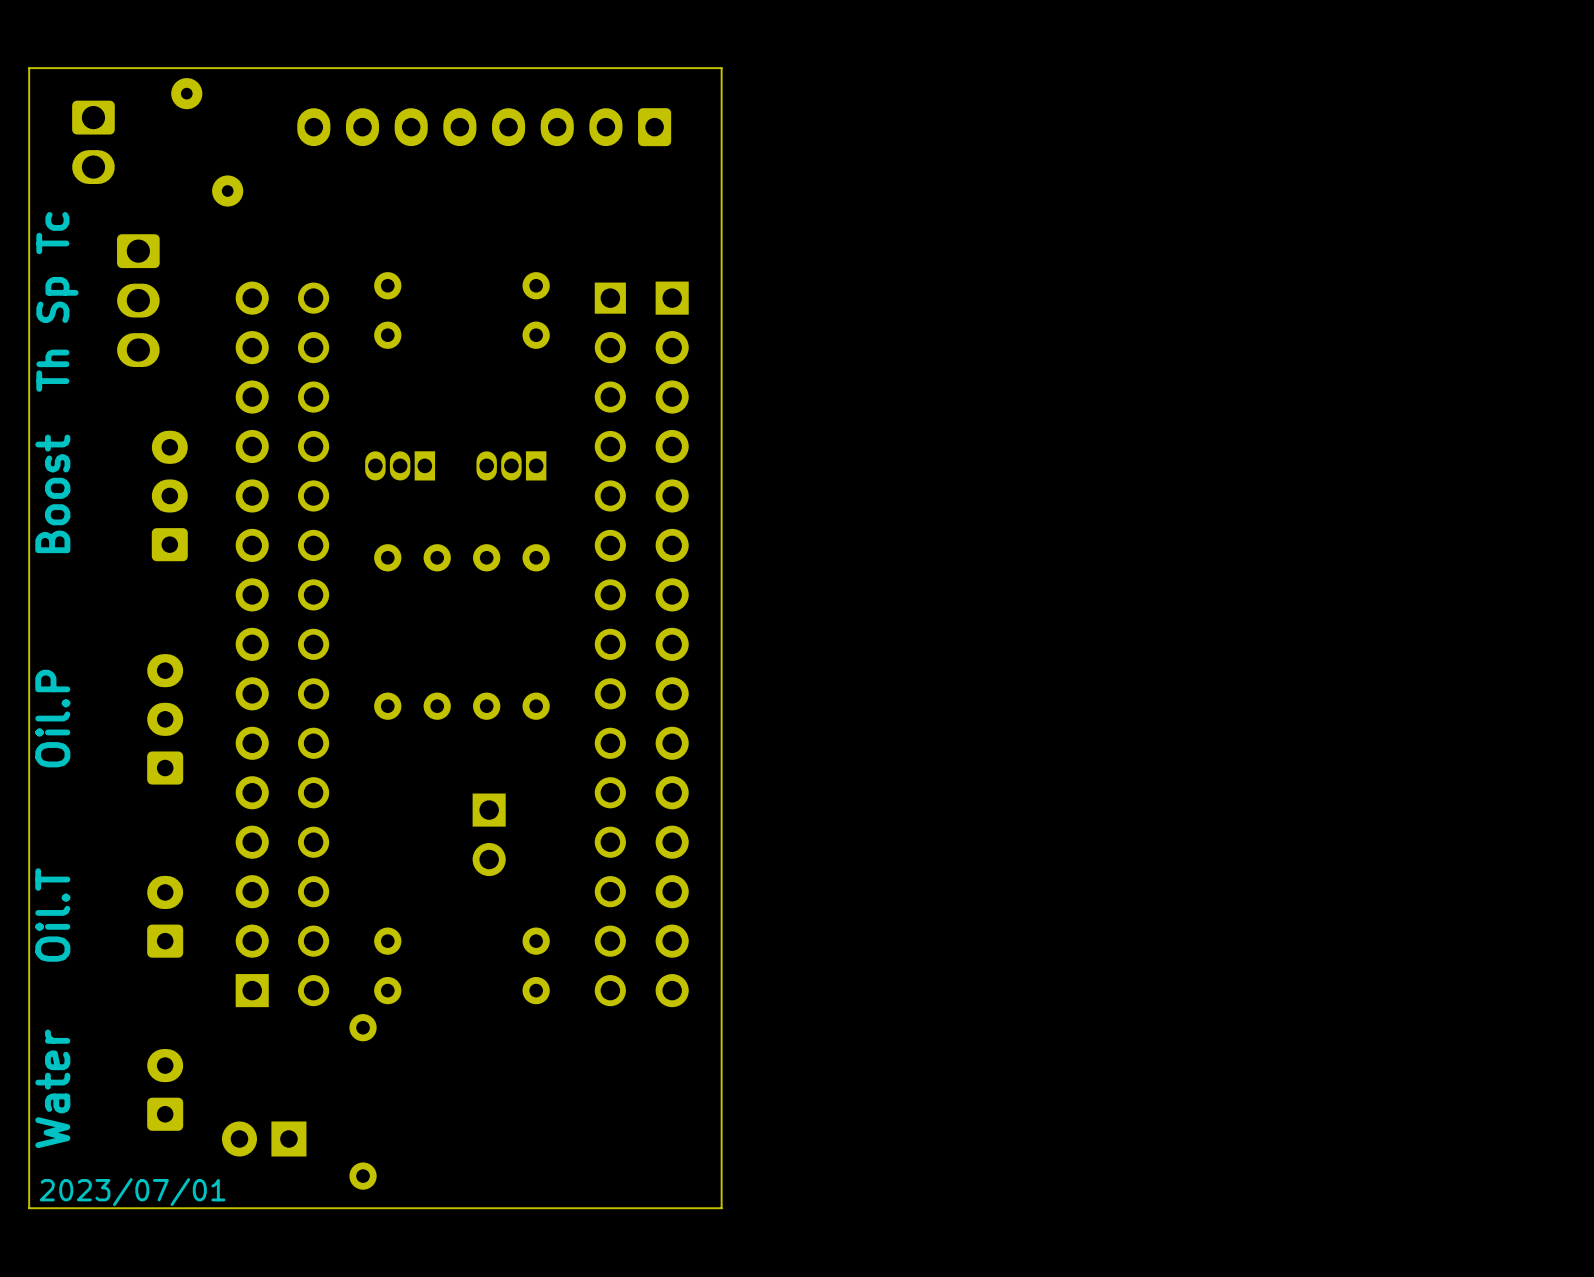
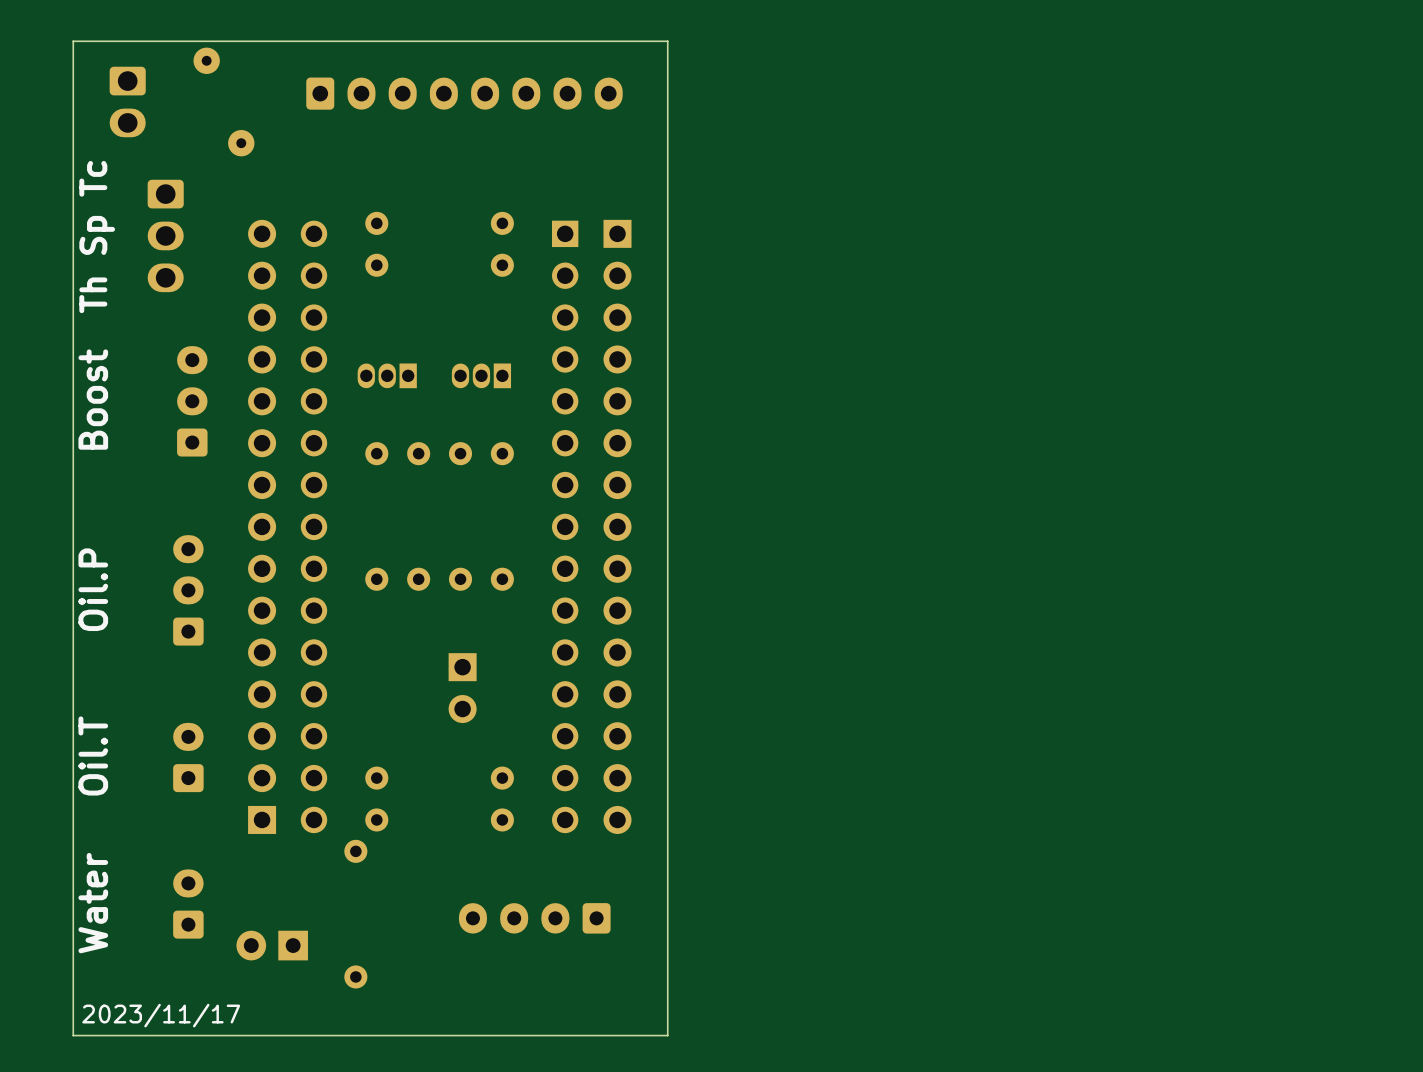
board edge: (29, 70) (29, 68) (721, 68) (721, 1208) (29, 1208) -> (73, 41) (667, 41) (667, 1035) (73, 1035) (73, 1004)
part rotation: 0° (484, 127) -> 180° (464, 93)
part: none -> (534, 918)
text: 2023/07/01 (132, 1192) -> none
text: none -> 2023/11/17 (161, 1015)

